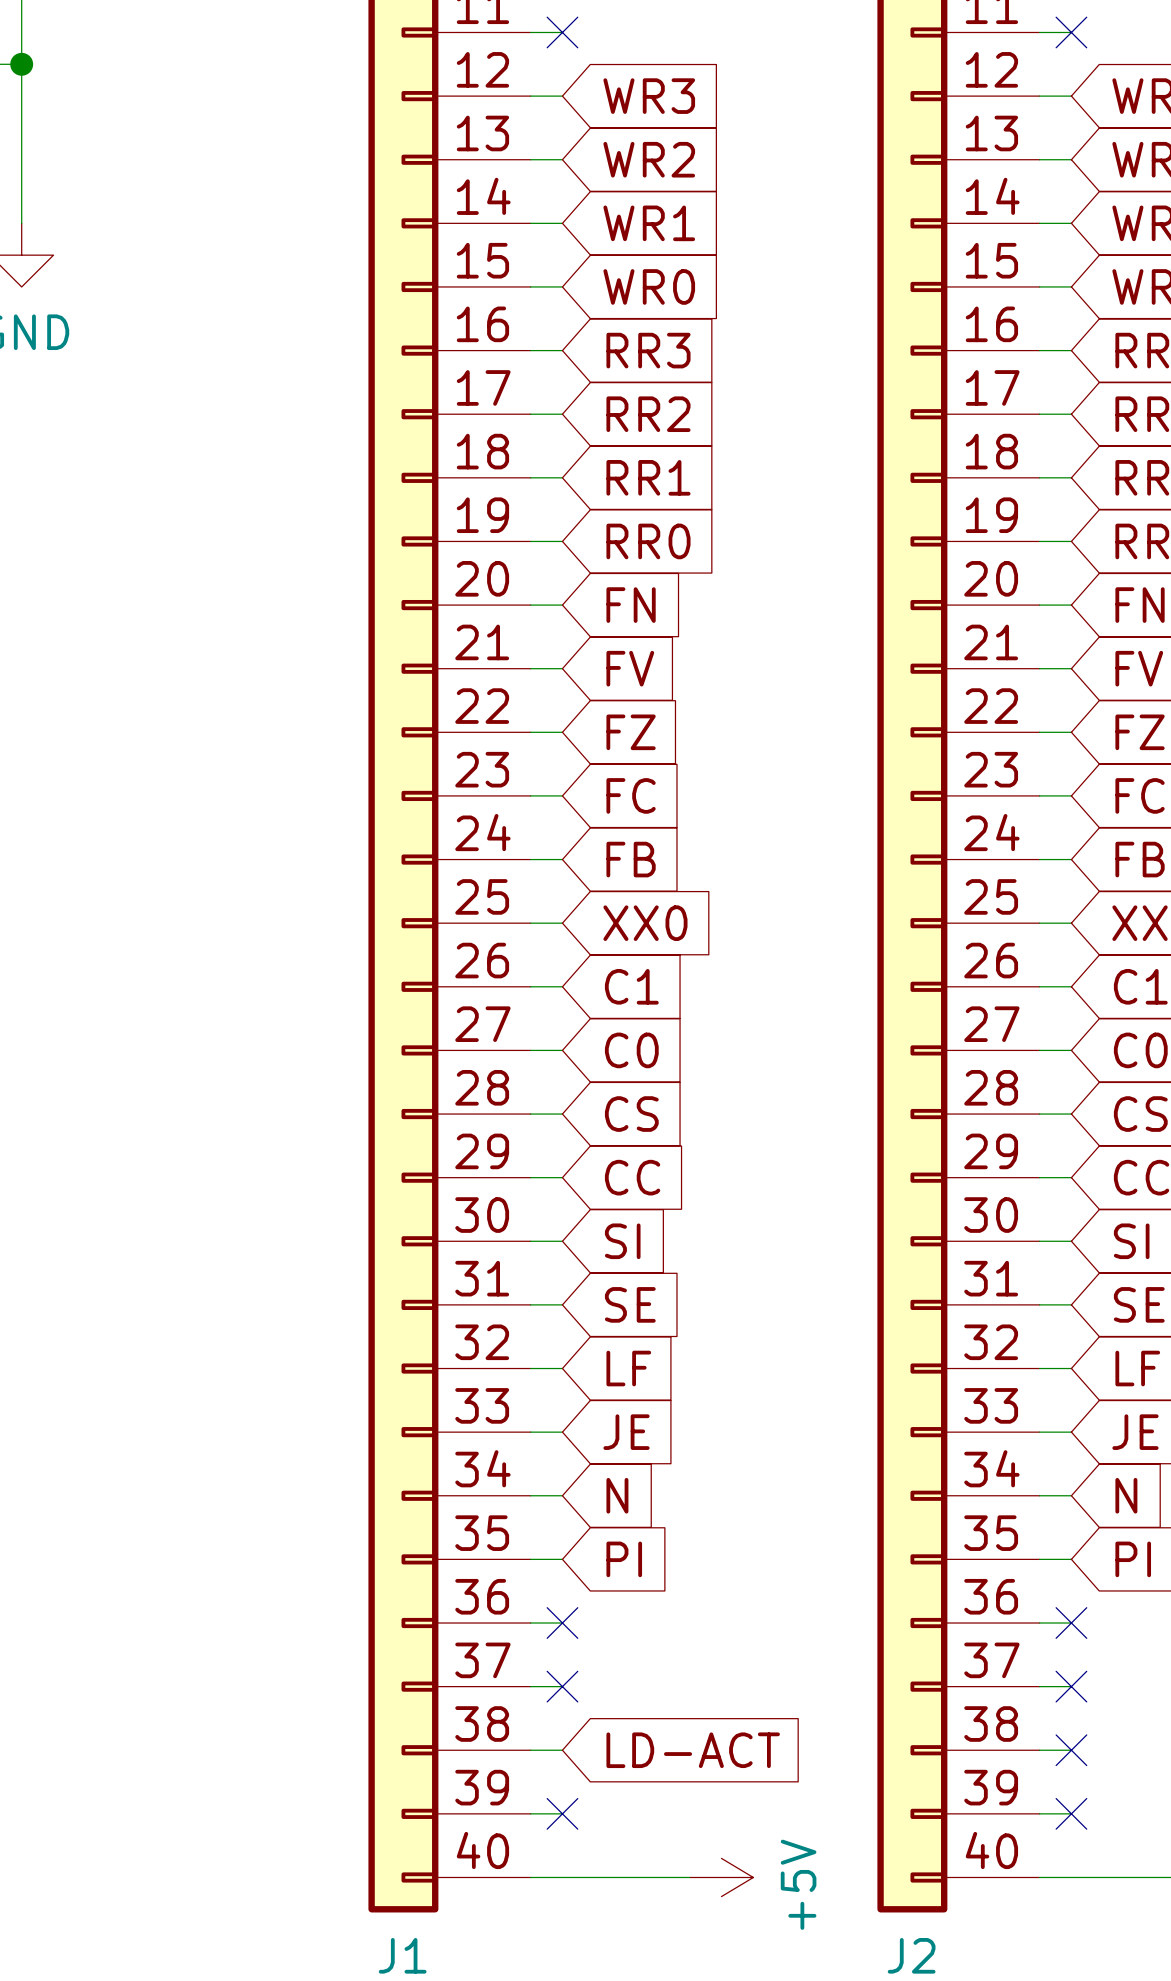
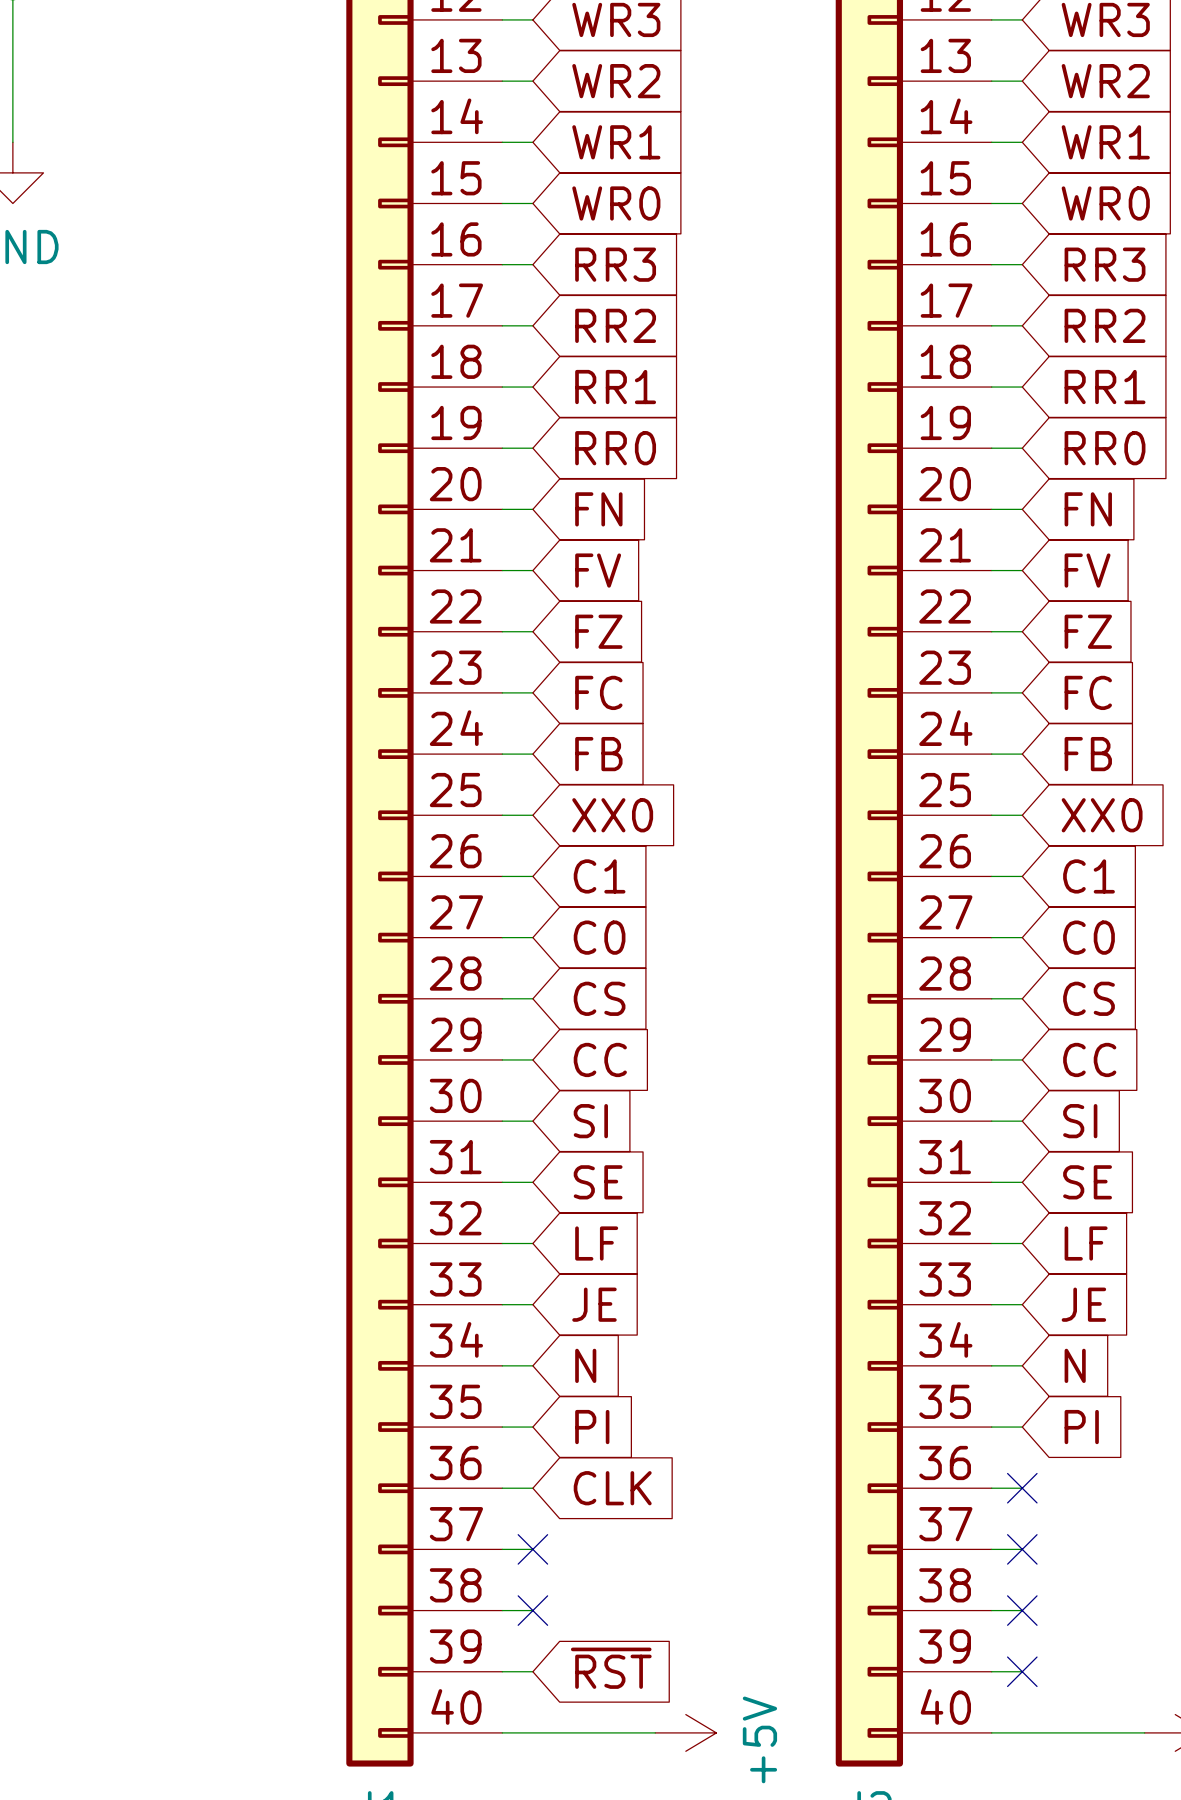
no-connect mark: (562, 1623) -> none
global label: none -> CLK (612, 1488)
no-connect mark: none -> (532, 1610)
global label: LD-ACT (693, 1750) -> none
global label: none -> ~{RST} (611, 1668)
no-connect mark: (562, 1813) -> none

